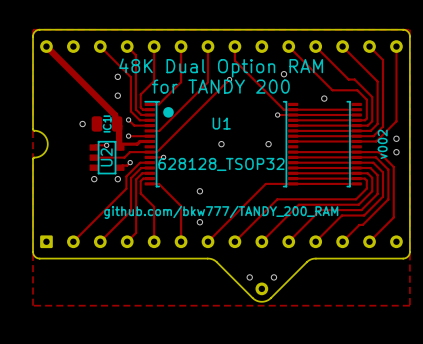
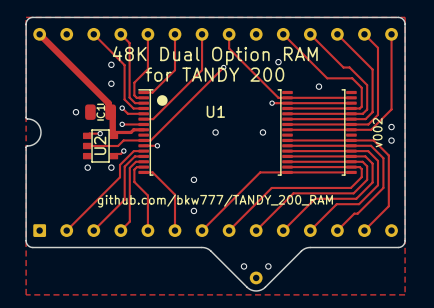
U1 value: 628128_TSOP32 (221, 164) -> none

